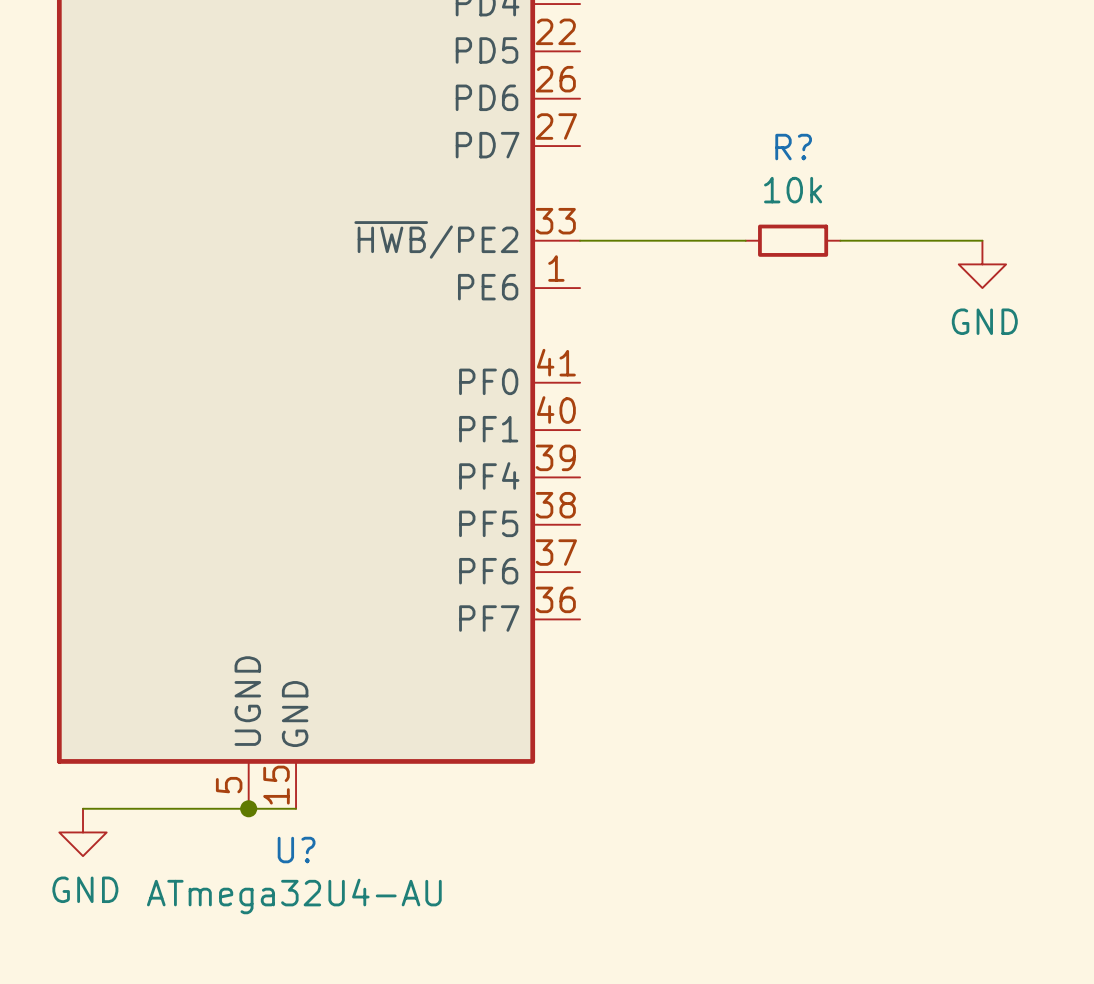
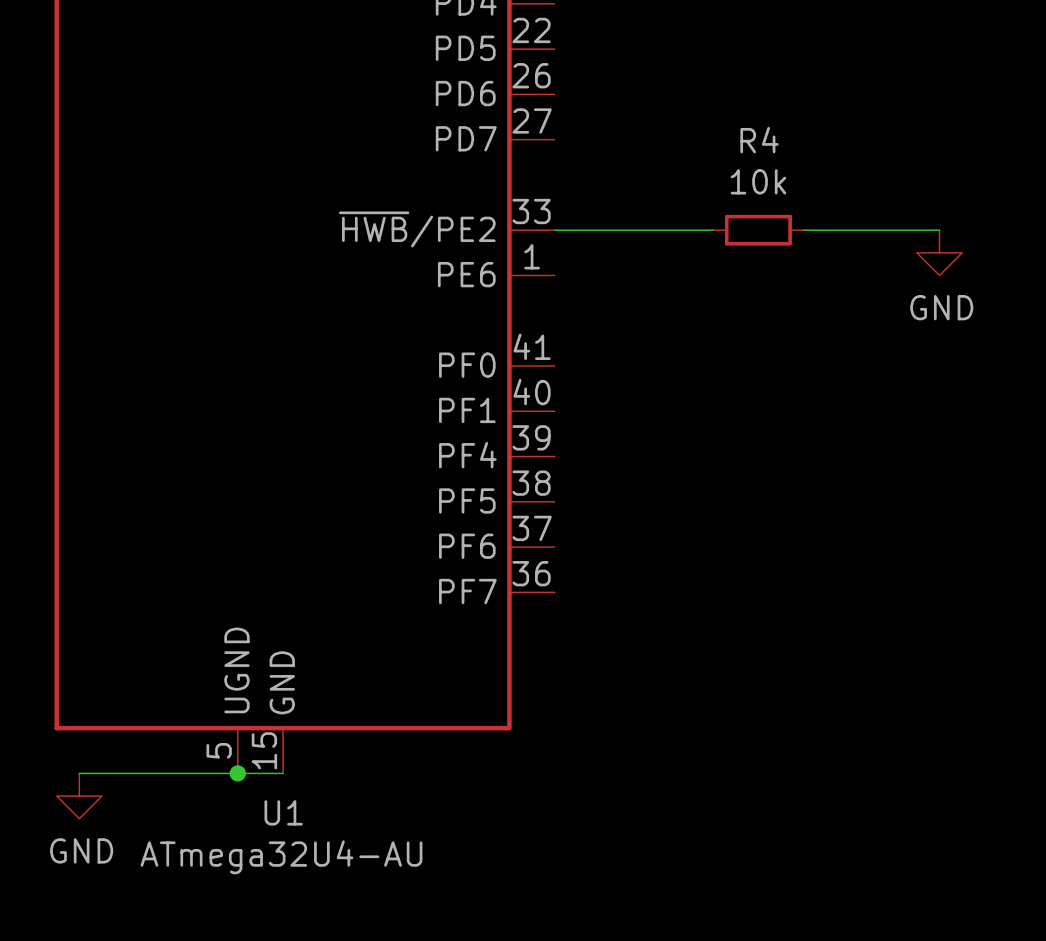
R? name: R? (793, 147) -> R4 (759, 140)
U? name: U? (296, 850) -> U1 (283, 812)

